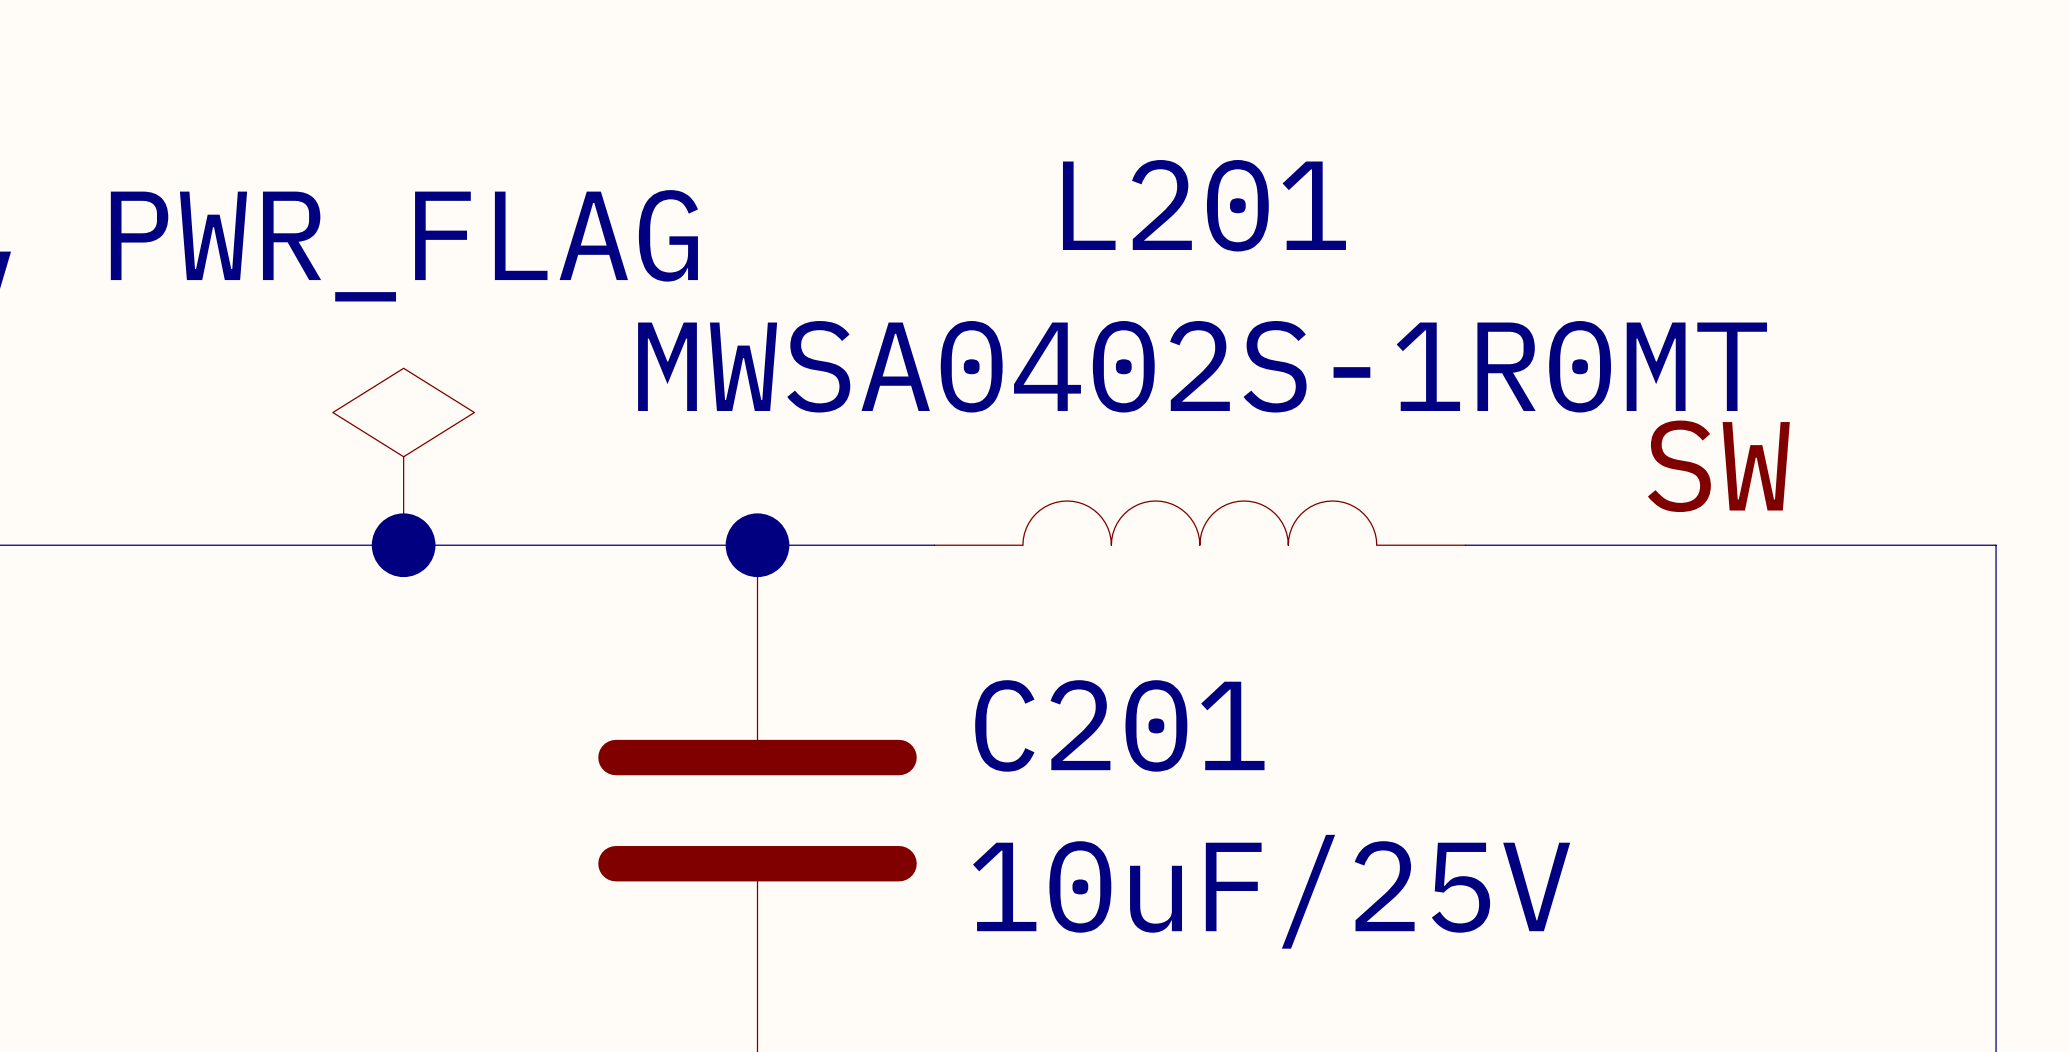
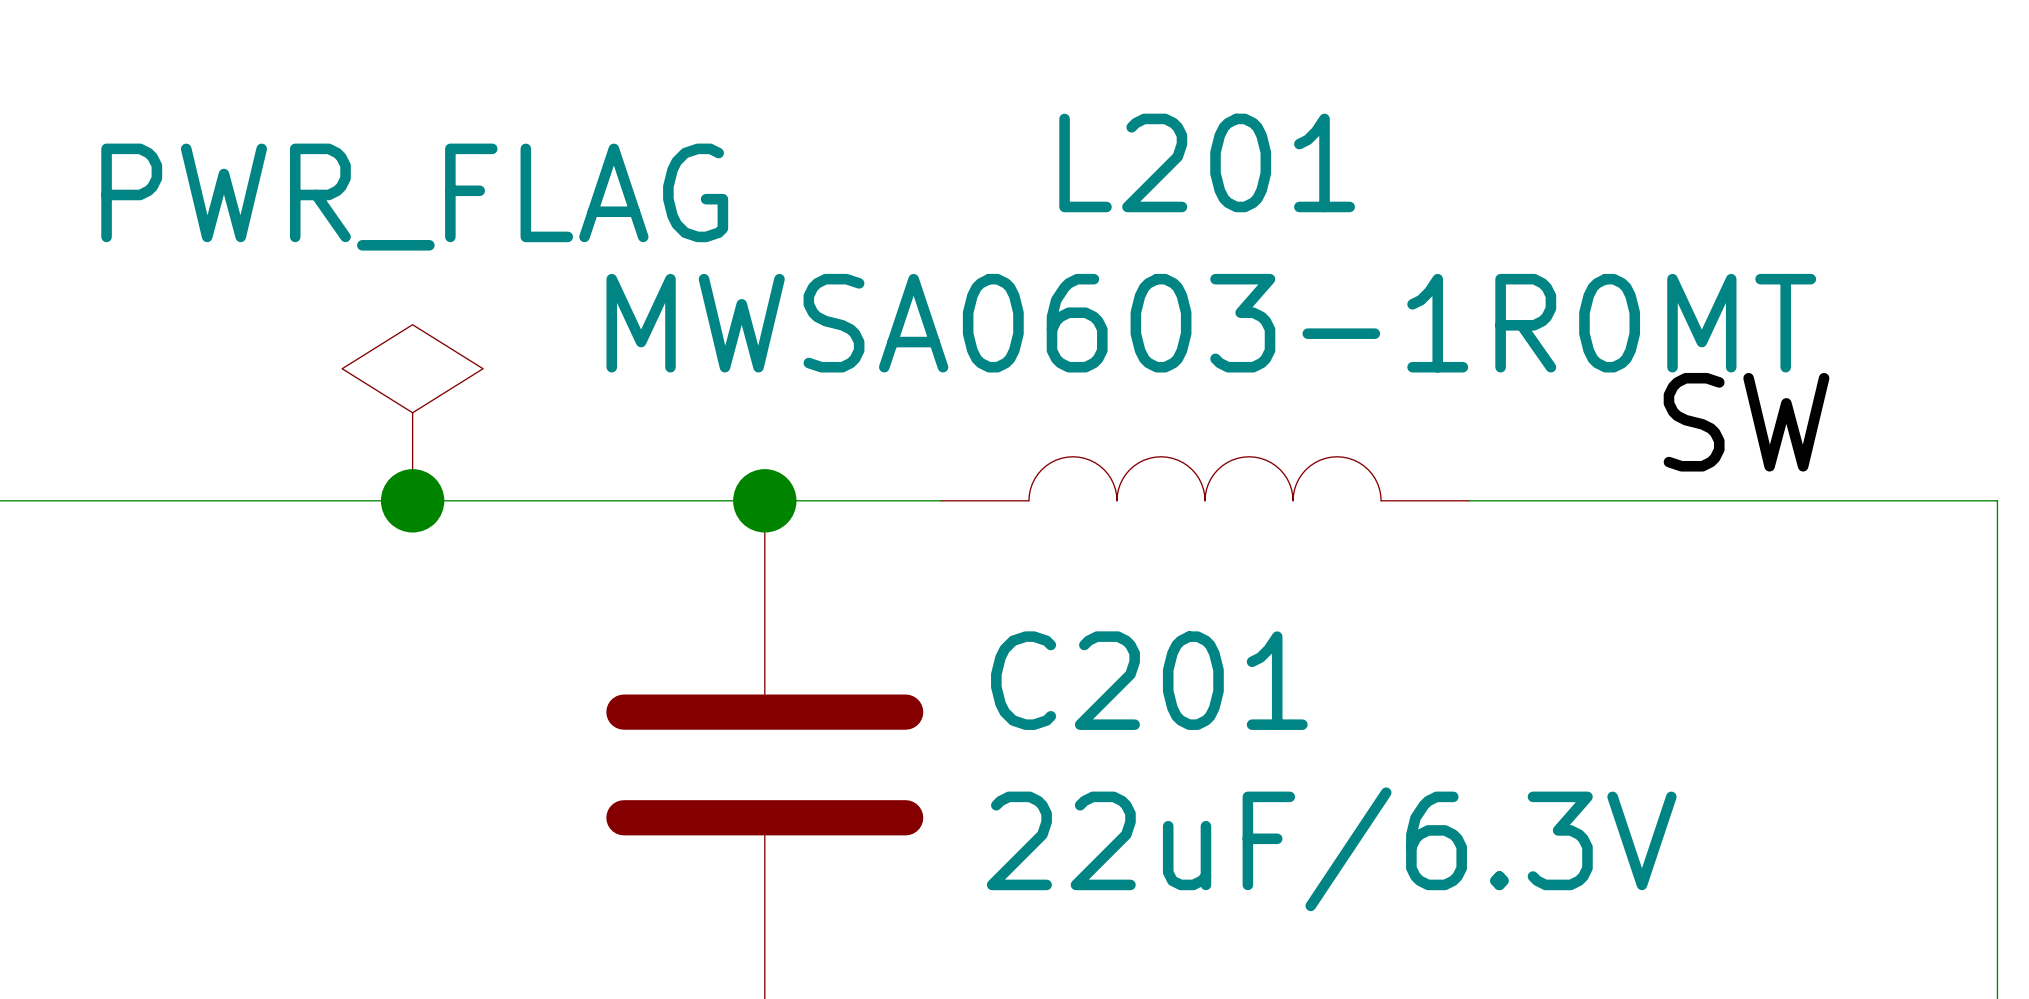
L201 value: MWSA0402S-1R0MT (1202, 366) -> MWSA0603-1R0MT (1211, 323)
C201 value: 10uF/25V (1271, 891) -> 22uF/6.3V (1331, 849)

